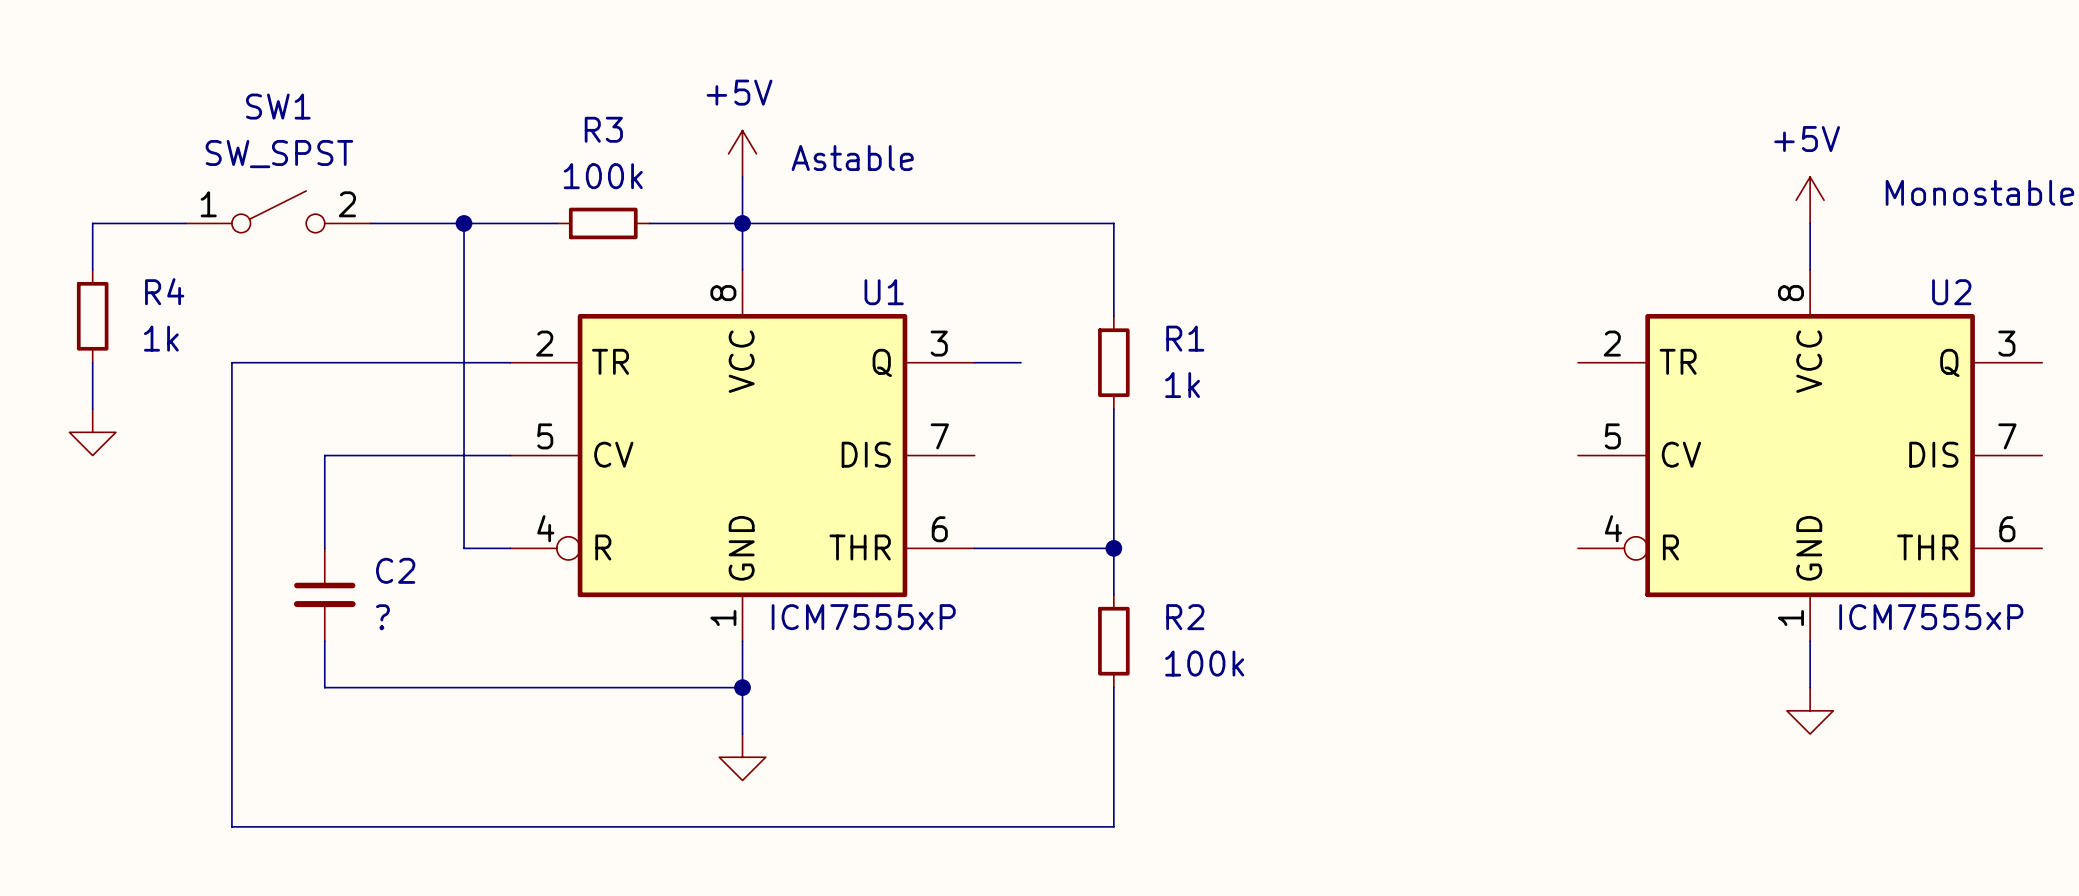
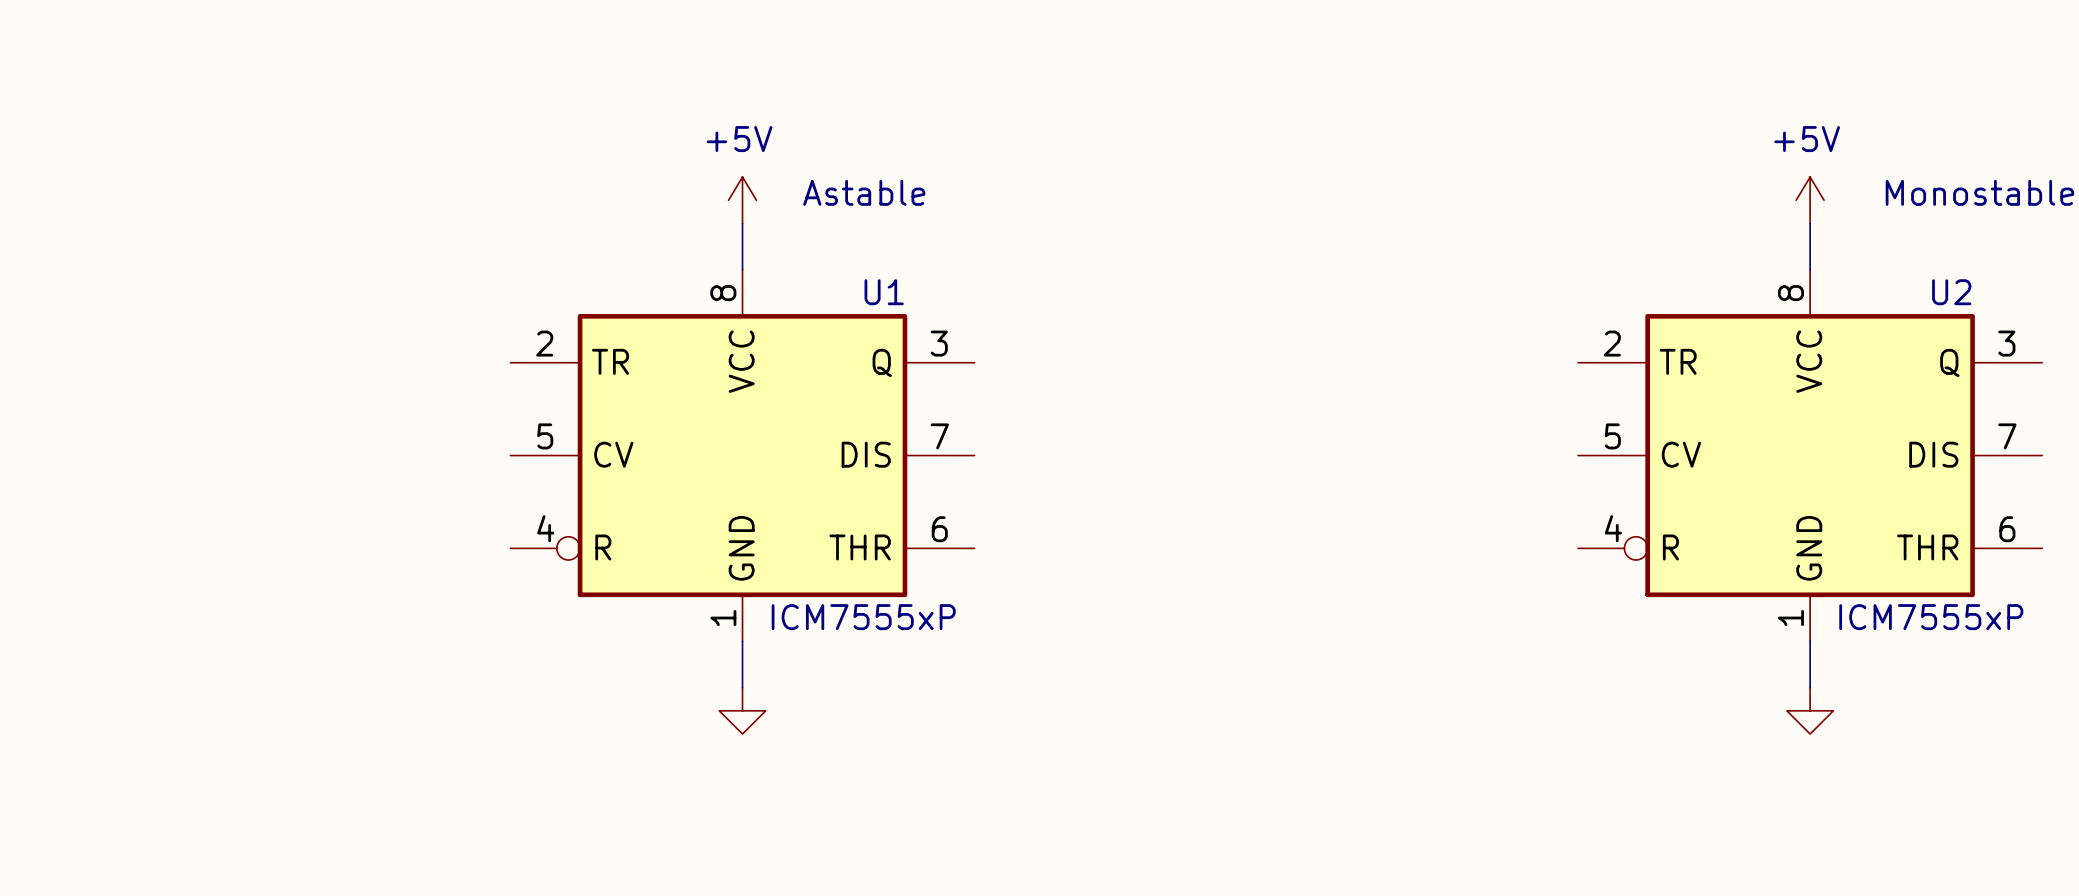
power symbol position: +5V (742, 153) -> +5V (742, 200)
text position: Astable (852, 158) -> Astable (864, 192)
SW1: SW_SPST (278, 211) -> none
wire: (185, 223) (92, 223) (92, 269) -> none
wire: (371, 223) (556, 223) -> none
wire: (464, 223) (464, 548) (510, 548) -> none
junction: (464, 223) -> none
R3: 100k (603, 223) -> none
wire: (649, 223) (1113, 223) (1113, 316) -> none
junction: (742, 223) -> none
R4: 1k (92, 316) -> none
wire: (92, 362) (92, 409) -> none
wire: (510, 362) (231, 362) (231, 826) (1113, 826) (1113, 687) -> none
wire: (974, 362) (1021, 362) -> none
R1: 1k (1113, 362) -> none
wire: (1113, 409) (1113, 594) -> none
power symbol: (92, 432) -> none
wire: (510, 455) (324, 455) (324, 548) -> none
wire: (974, 548) (1113, 548) -> none
junction: (1113, 548) -> none
C2: ? (324, 594) -> none
wire: (324, 641) (324, 687) (742, 687) (742, 734) -> none
R2: 100k (1113, 641) -> none
junction: (742, 687) -> none
power symbol position: (742, 757) -> (742, 710)

